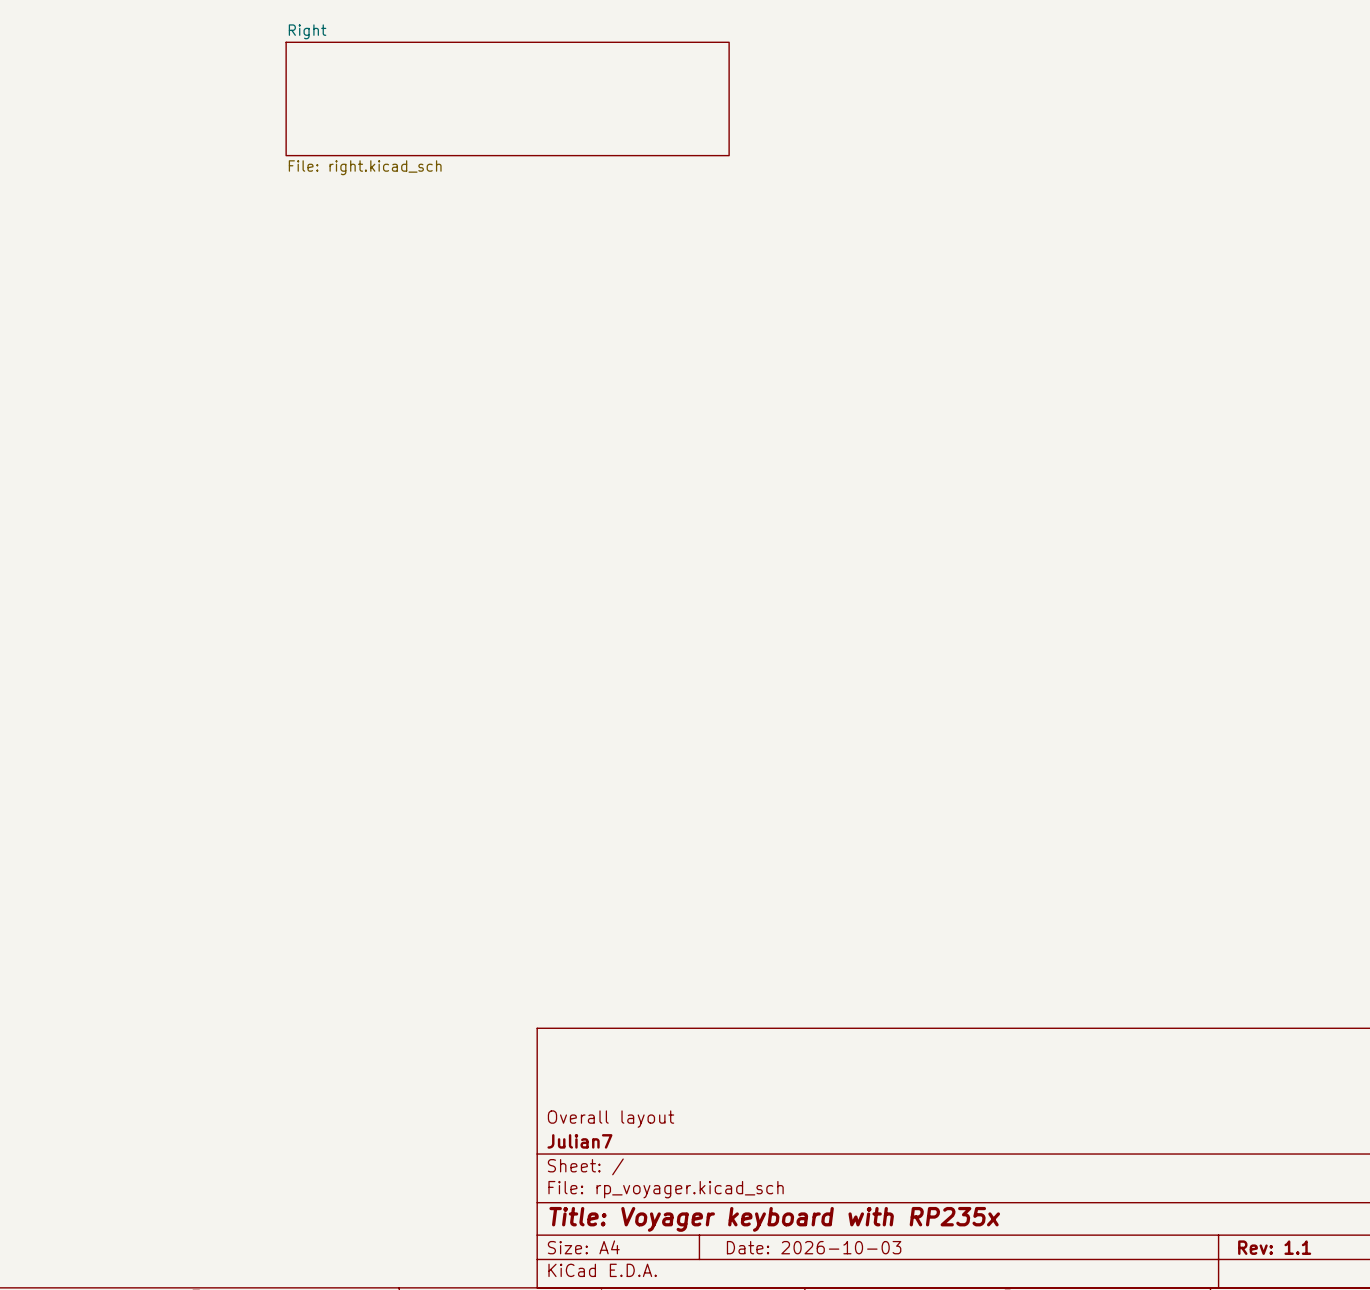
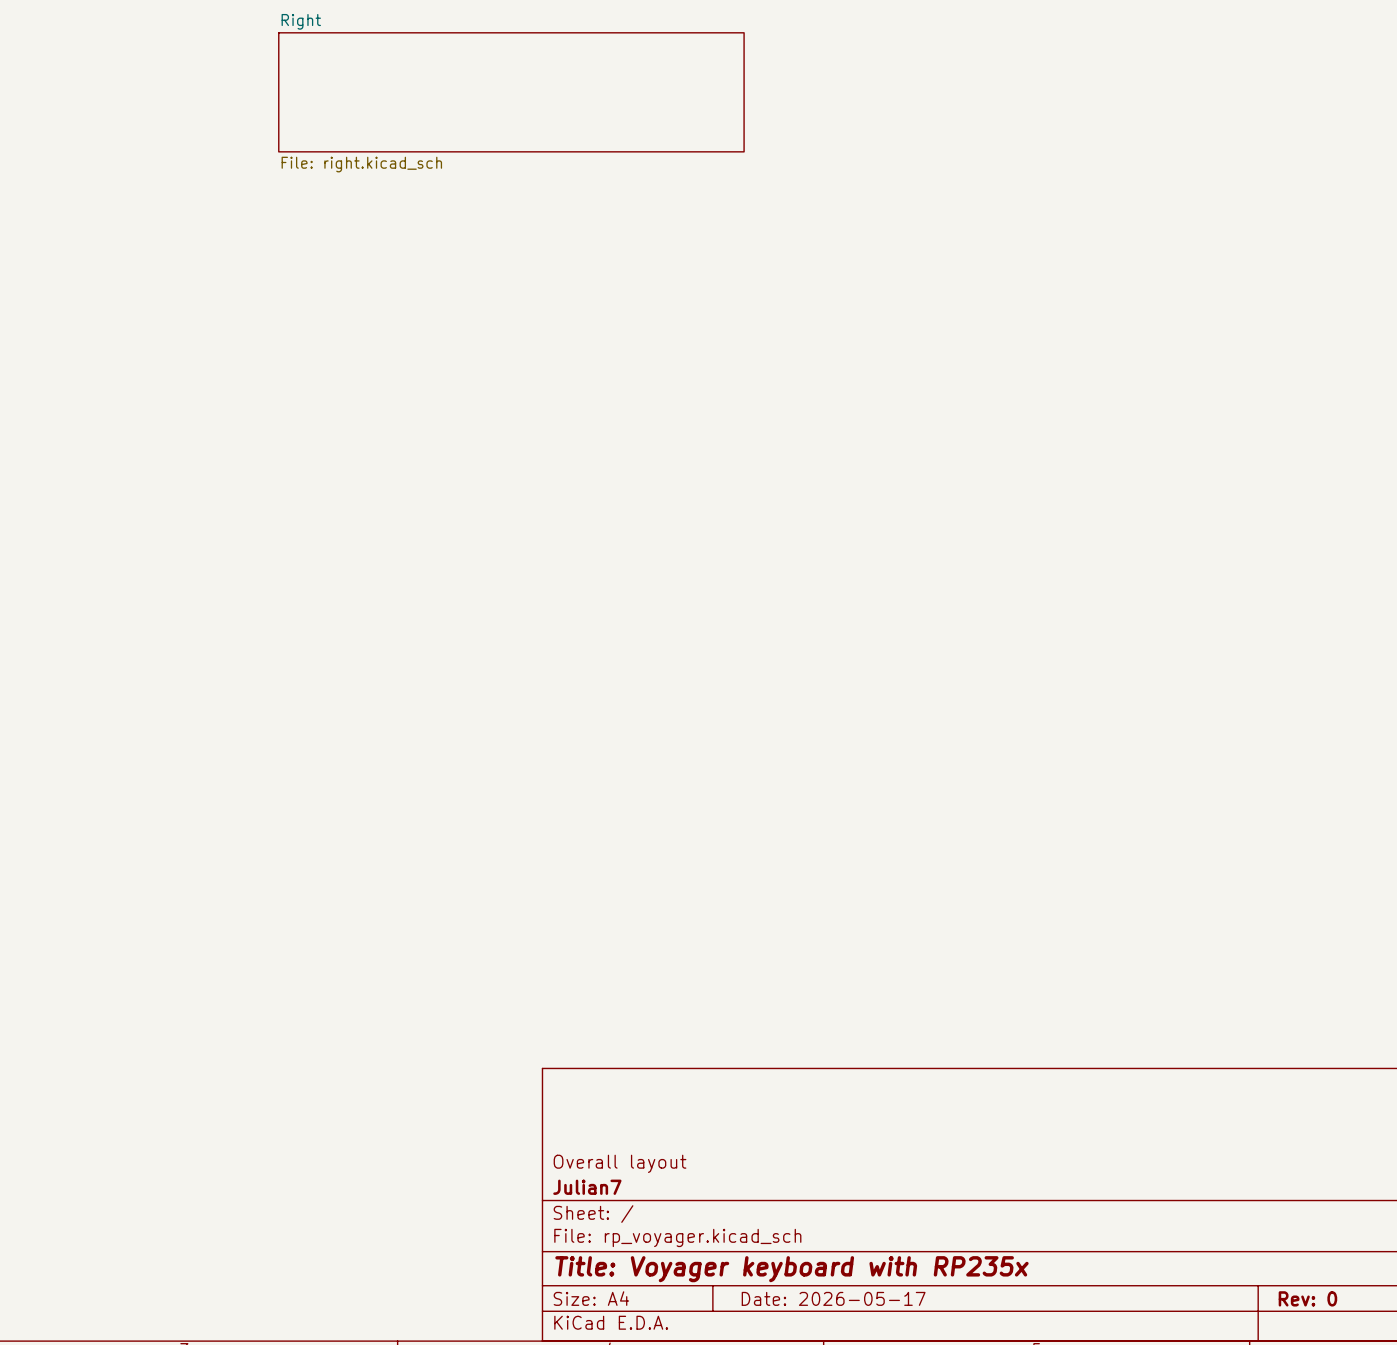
title block: Date: 2026-10-03 (814, 1247) -> Date: 2026-05-17 (833, 1298)
title block: Rev: 1.1 (1274, 1247) -> Rev: 0 (1307, 1298)

